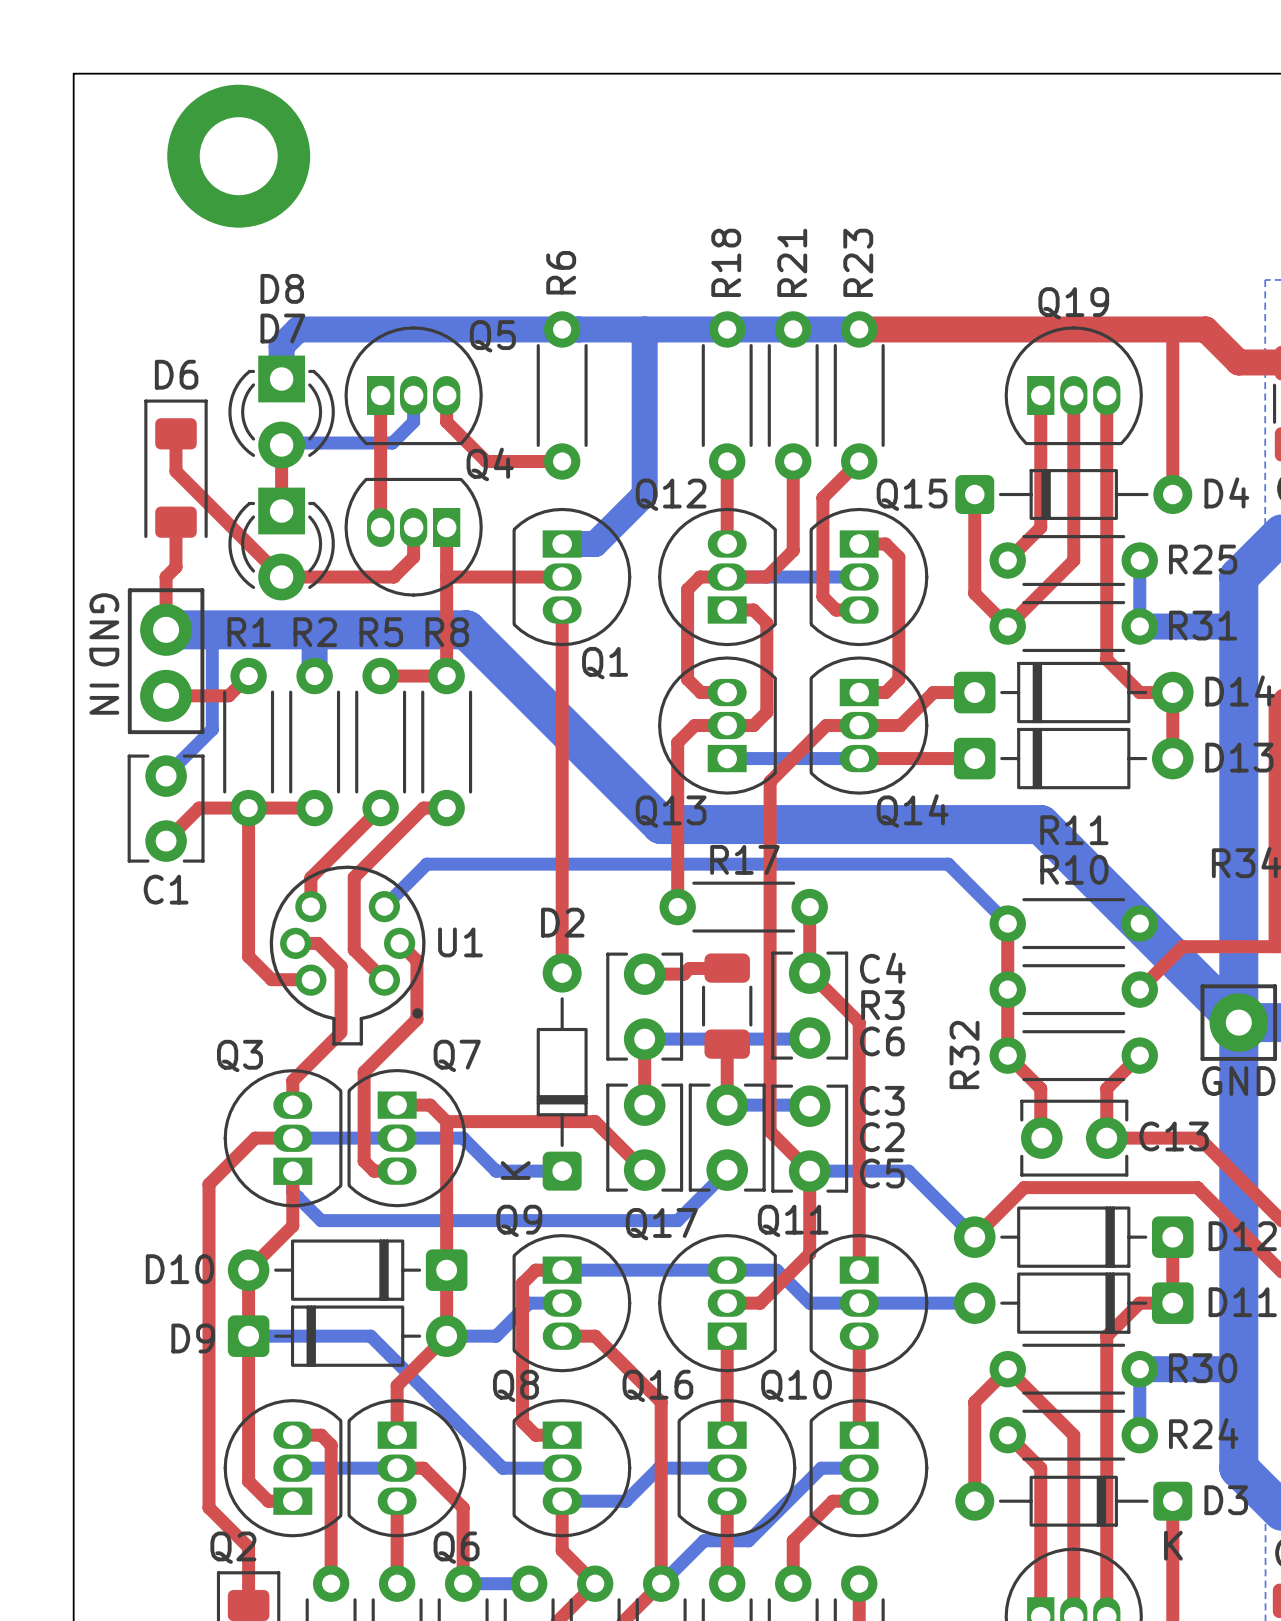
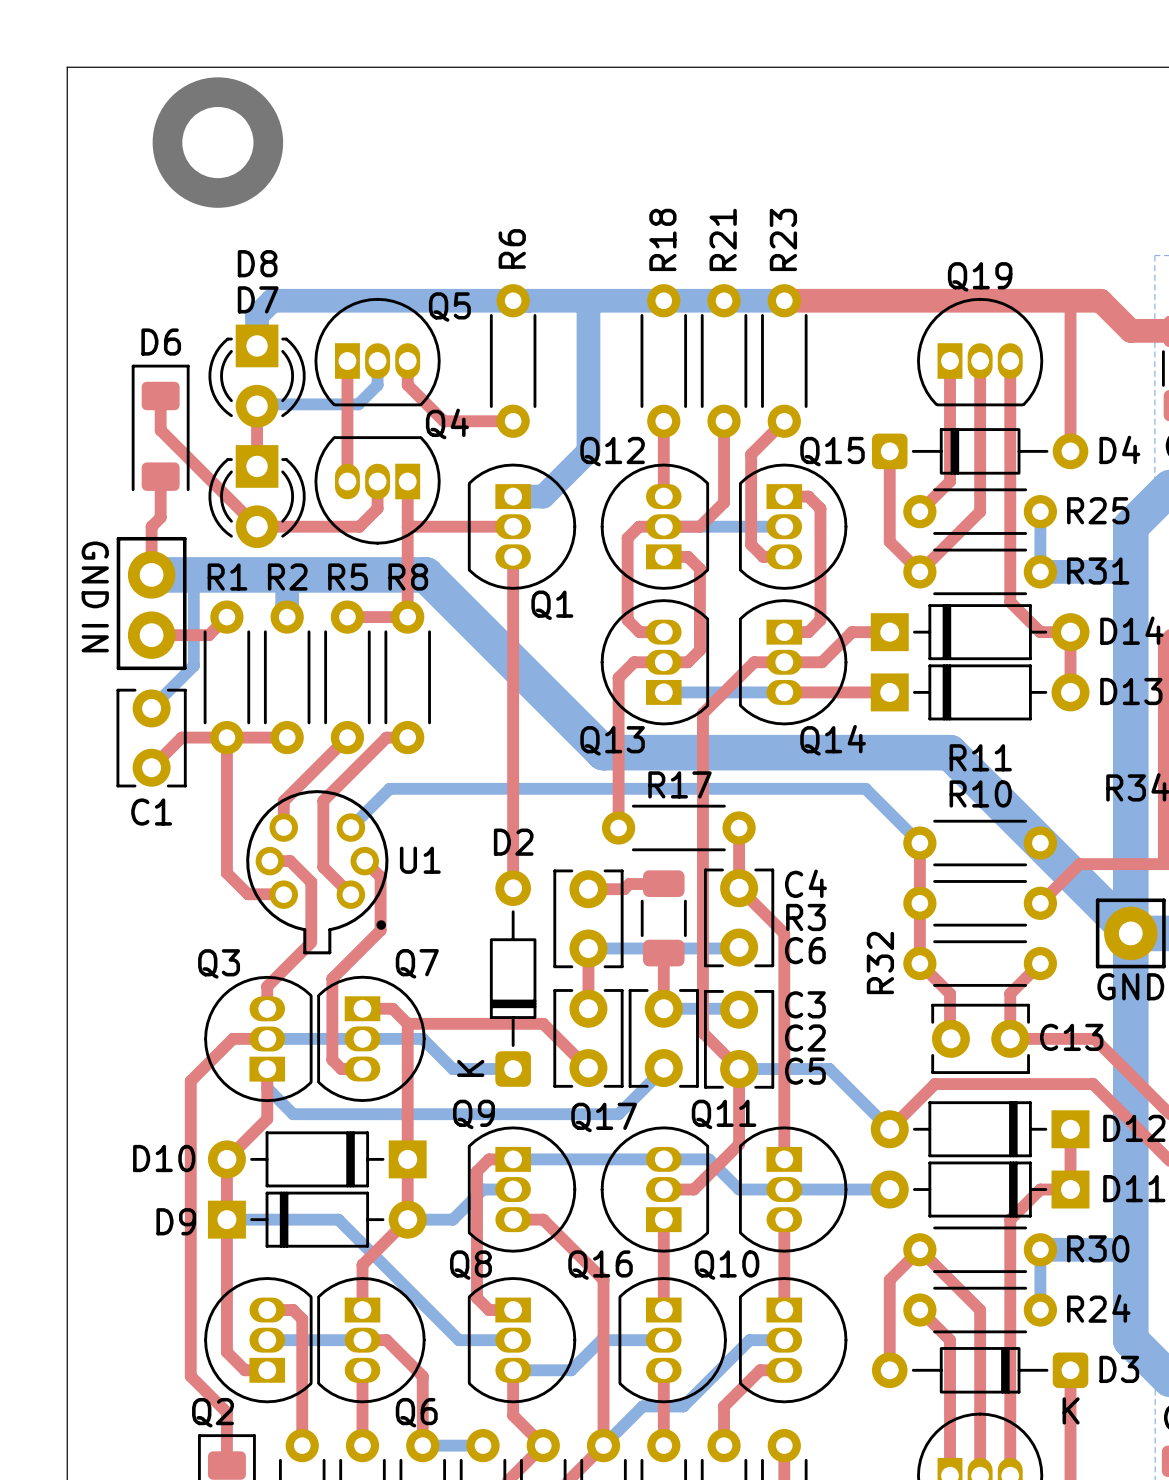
D14 footprint: [953, 661, 1194, 724] -> [870, 604, 1090, 661]
D13 footprint: [953, 727, 1194, 790] -> [870, 664, 1090, 721]
D12 footprint: [953, 1206, 1194, 1268] -> [870, 1101, 1090, 1158]
D10 footprint: [227, 1239, 468, 1301] -> [207, 1131, 427, 1188]
D11 footprint: [953, 1272, 1194, 1334] -> [870, 1161, 1090, 1218]
D9 footprint: [227, 1305, 468, 1367] -> [207, 1191, 427, 1248]

